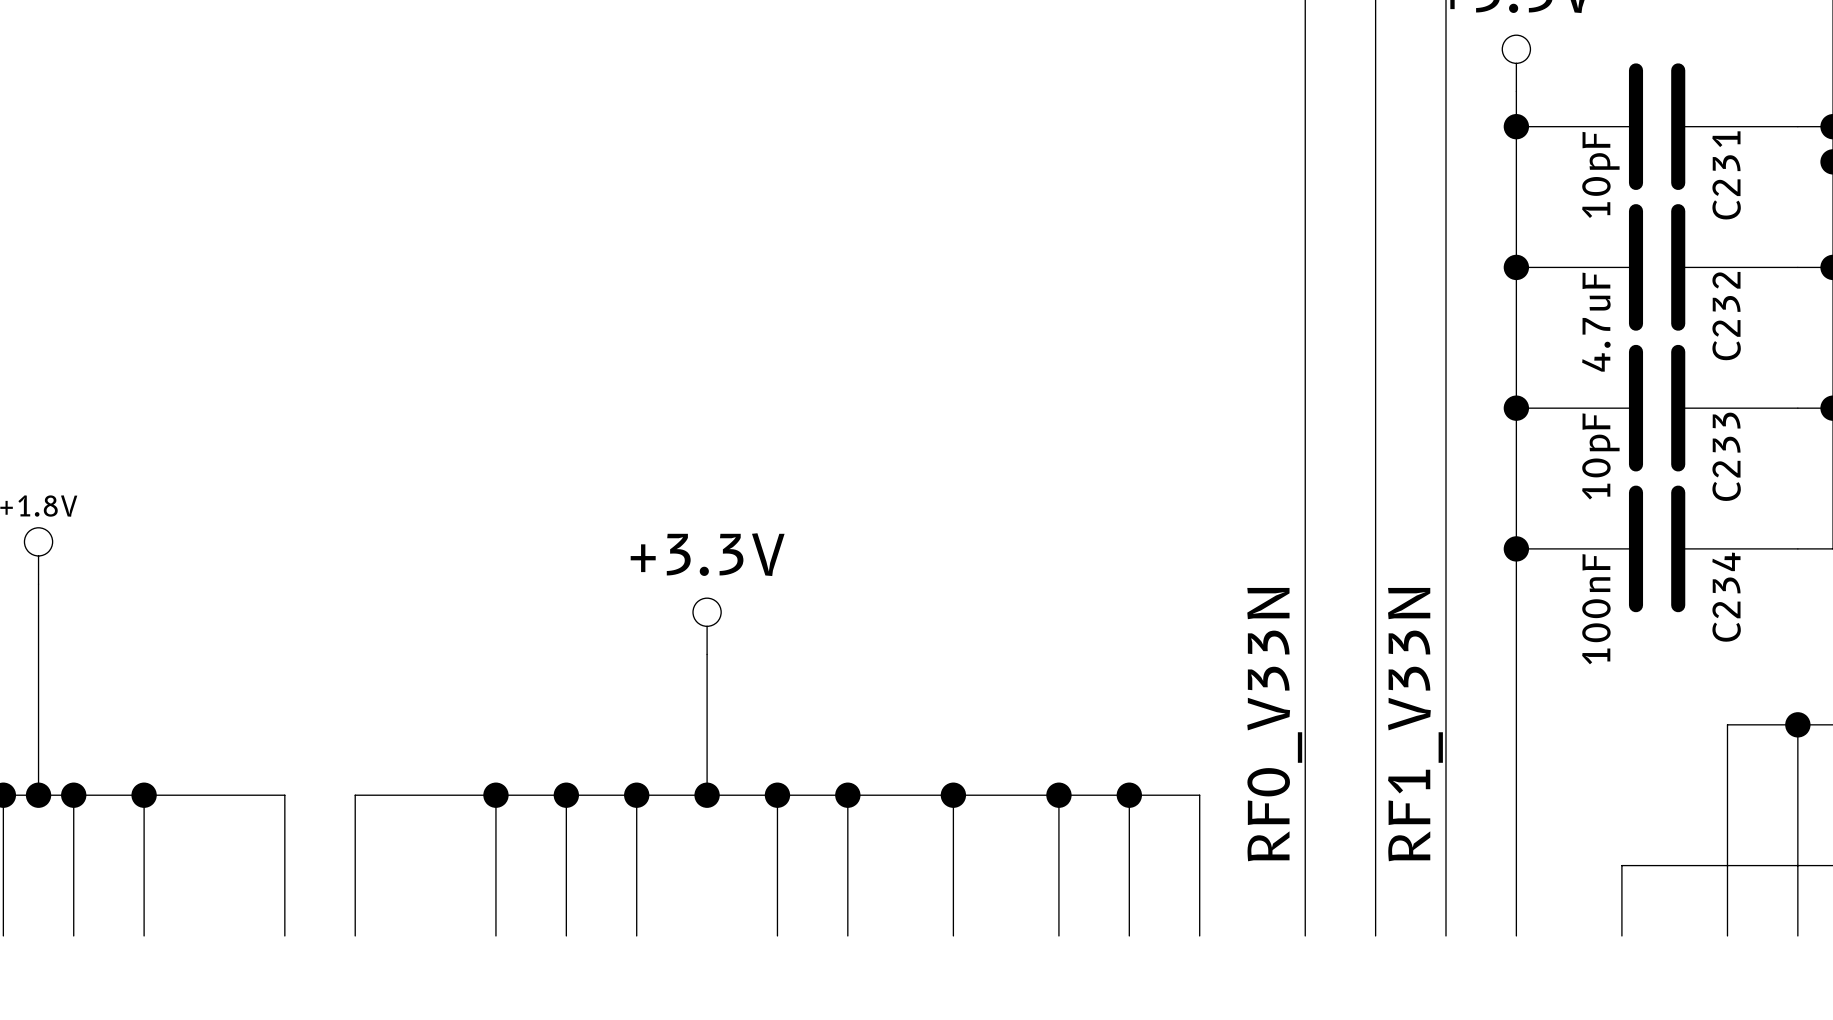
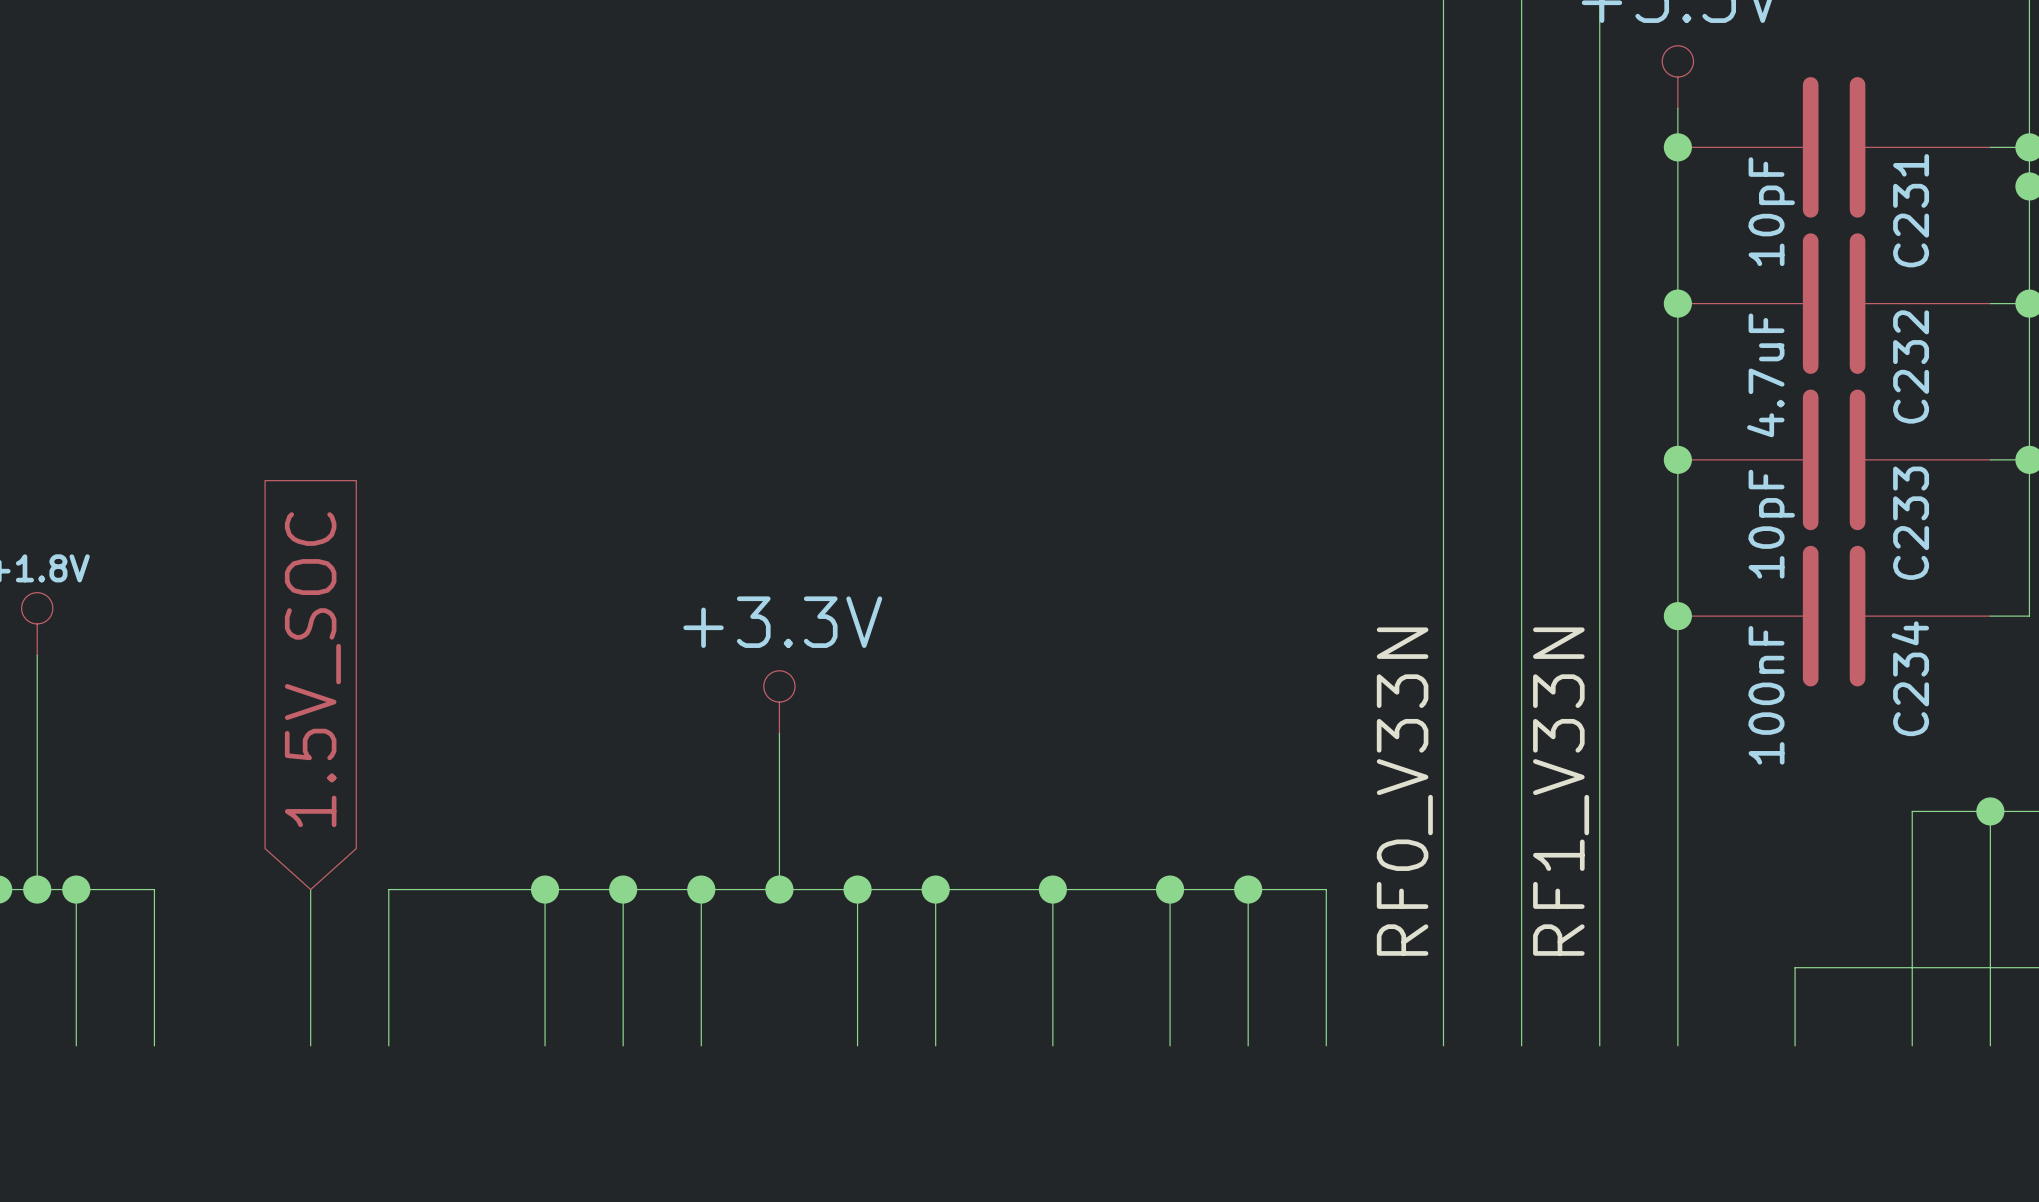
global label: none -> 1.5V_SOC (312, 669)
wire: (144, 795) (284, 795) -> none
junction: (144, 795) -> none

